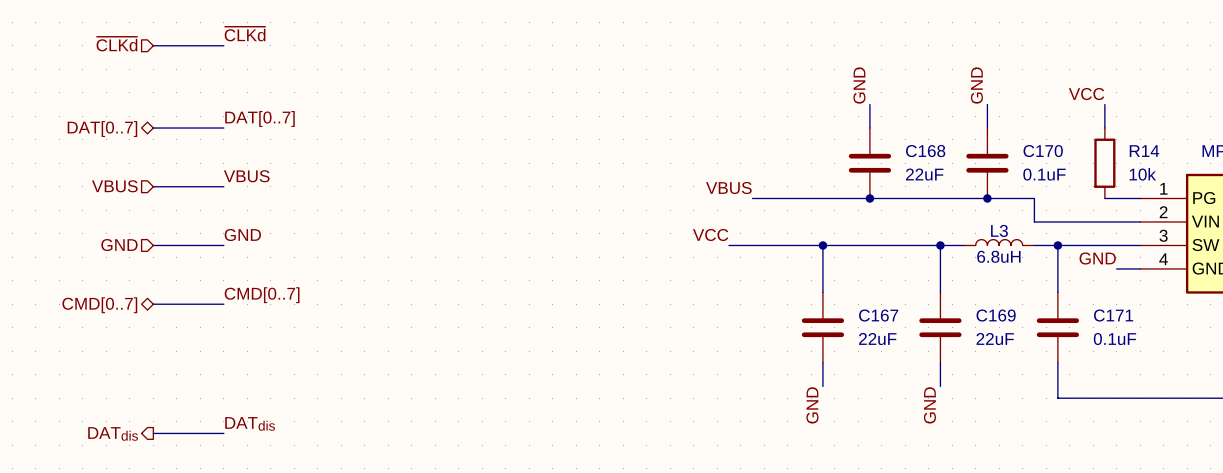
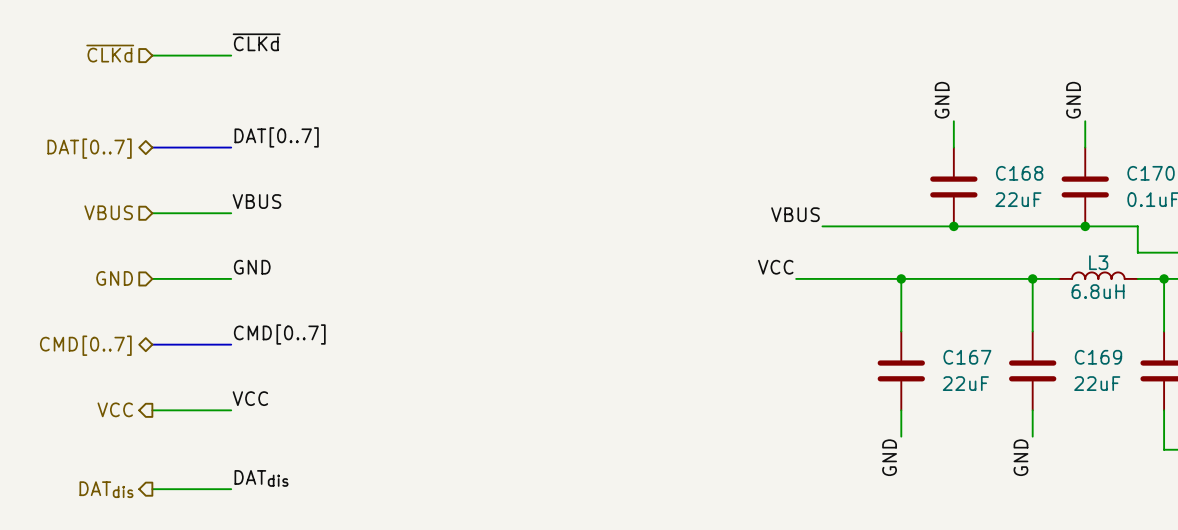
label: none -> VCC (250, 398)
hierarchical label: none -> VCC (115, 409)
wire: none -> (152, 410) (231, 410)

